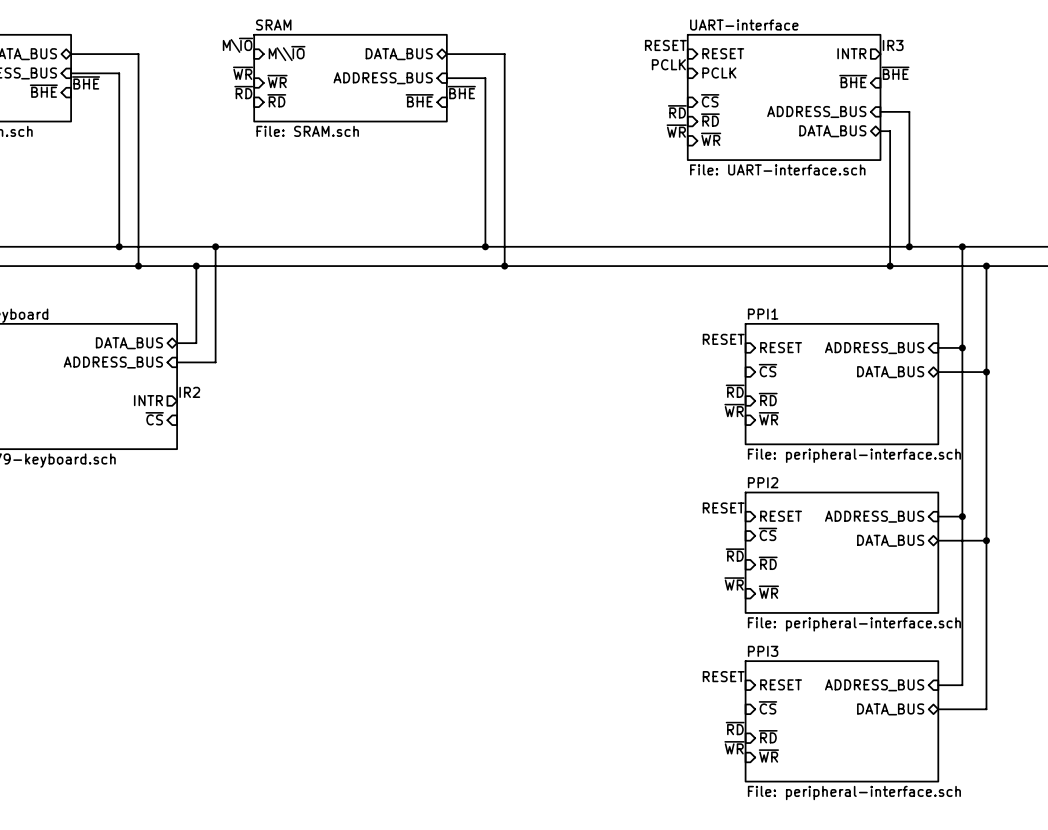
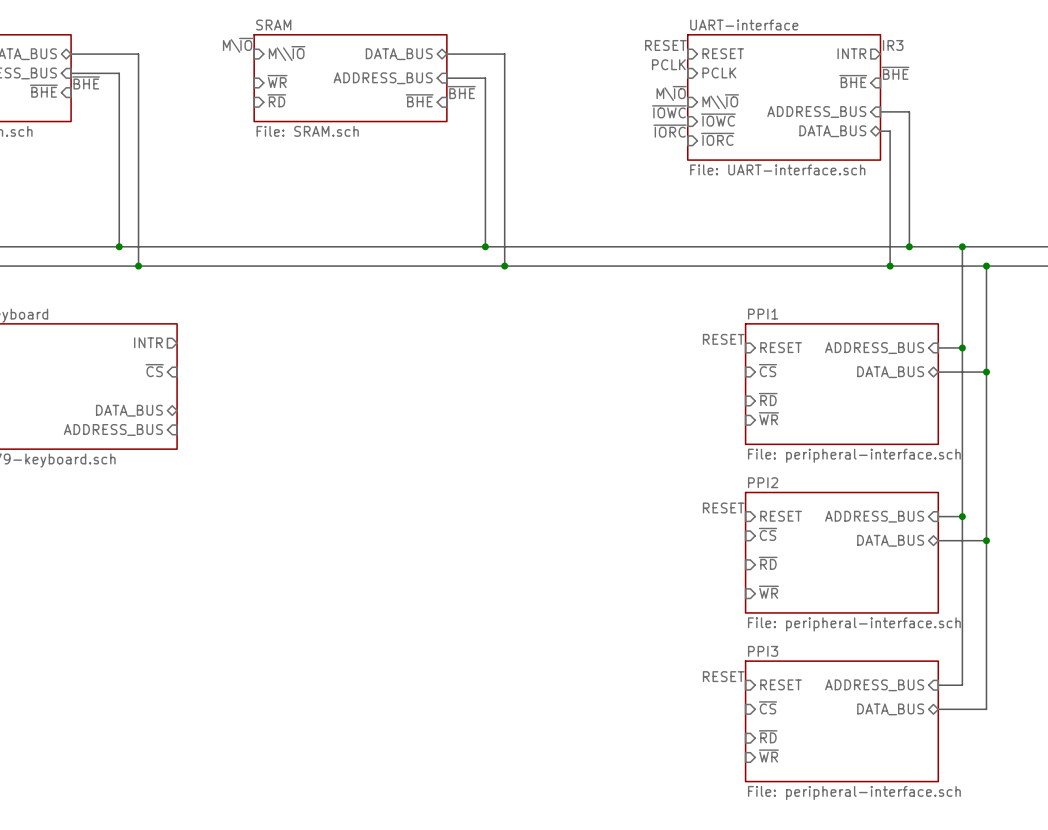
label: ~{WR} (243, 73) -> none
label: ~{RD} (243, 92) -> none
label: none -> M\~{IO} (671, 93)
sheet pin: ~{CS} (710, 100) -> M\\~{IO} (720, 101)
label: ~{RD} (677, 111) -> ~{IOWC} (669, 111)
sheet pin: ~{RD} (710, 120) -> ~{IOWC} (718, 120)
label: ~{WR} (676, 131) -> ~{IORC} (670, 131)
sheet pin: ~{WR} (711, 139) -> ~{IORC} (717, 139)
bus: (215, 246) (215, 362) (177, 362) -> none
junction: (215, 246) -> none
bus: (196, 266) (196, 343) (177, 343) -> none
junction: (196, 266) -> none
sheet pin shape: bidirectional (129, 343) -> output (148, 342)
sheet pin: DATA_BUS (129, 343) -> INTR (148, 342)
sheet pin position: ADDRESS_BUS (113, 362) -> ADDRESS_BUS (113, 429)
label: ~{RD} (735, 391) -> none
label: IR2 (189, 392) -> none
sheet pin: INTR (148, 400) -> none
sheet pin: none -> DATA_BUS (129, 410)
label: ~{WR} (734, 410) -> none
sheet pin position: ~{CS} (154, 418) -> ~{CS} (154, 370)
label: ~{RD} (735, 555) -> none
label: ~{WR} (734, 583) -> none
label: ~{RD} (735, 728) -> none
label: ~{WR} (734, 747) -> none

